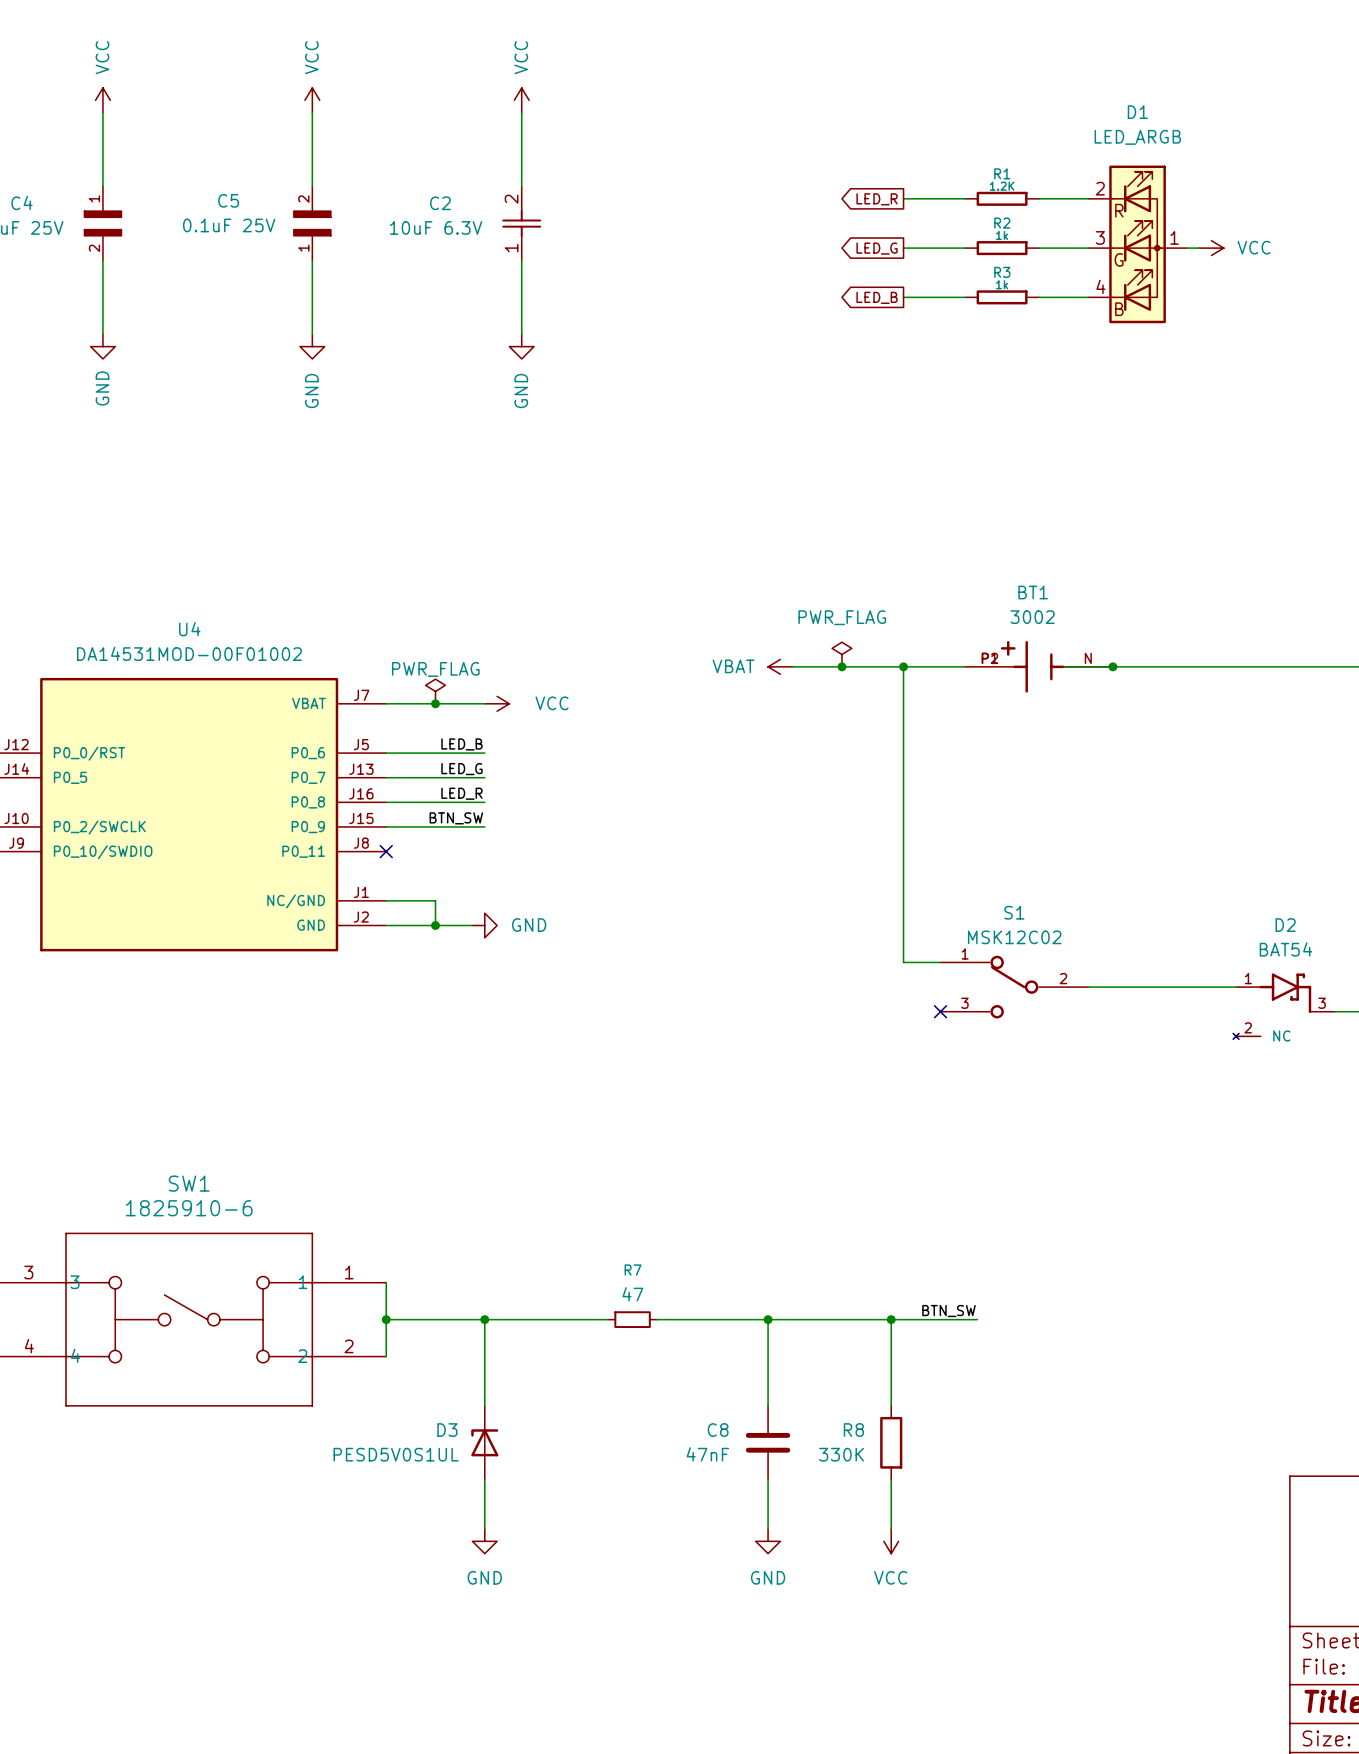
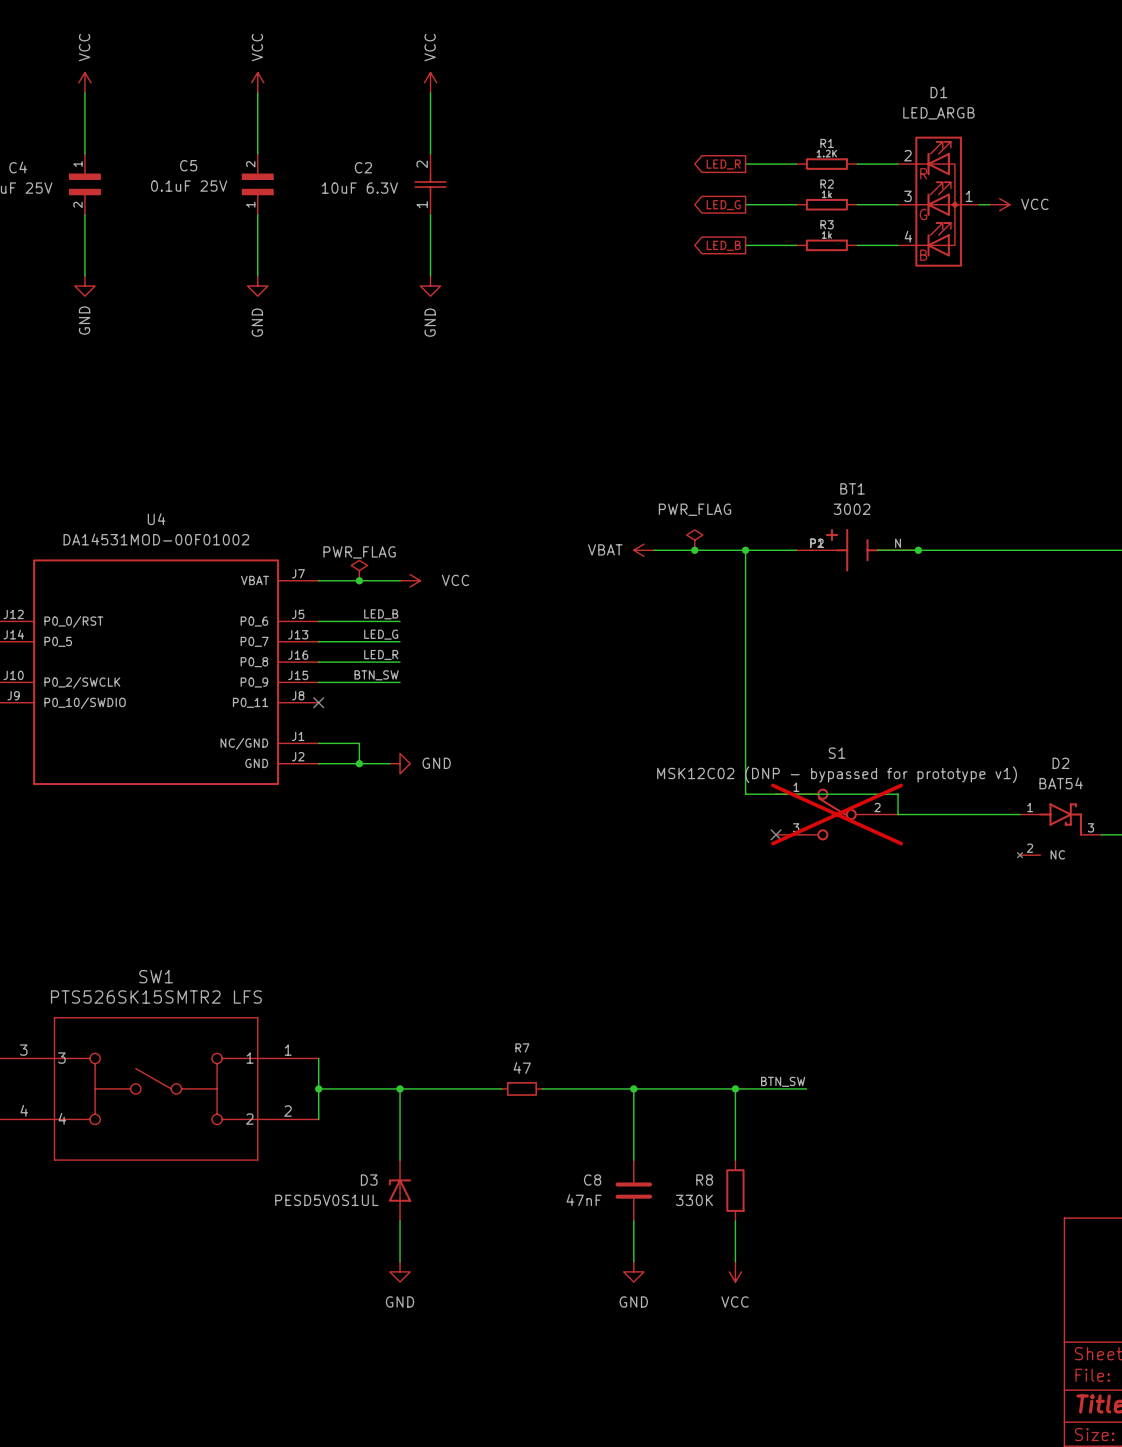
S1 value: MSK12C02 (1014, 937) -> MSK12C02 (DNP - bypassed for prototype v1) (837, 774)
wire: none -> (776, 794) (898, 794) (898, 814)
S1 do-not-place cross: none -> (837, 814)
SW1 value: 1825910-6 (189, 1208) -> PTS526SK15SMTR2 LFS (156, 997)

